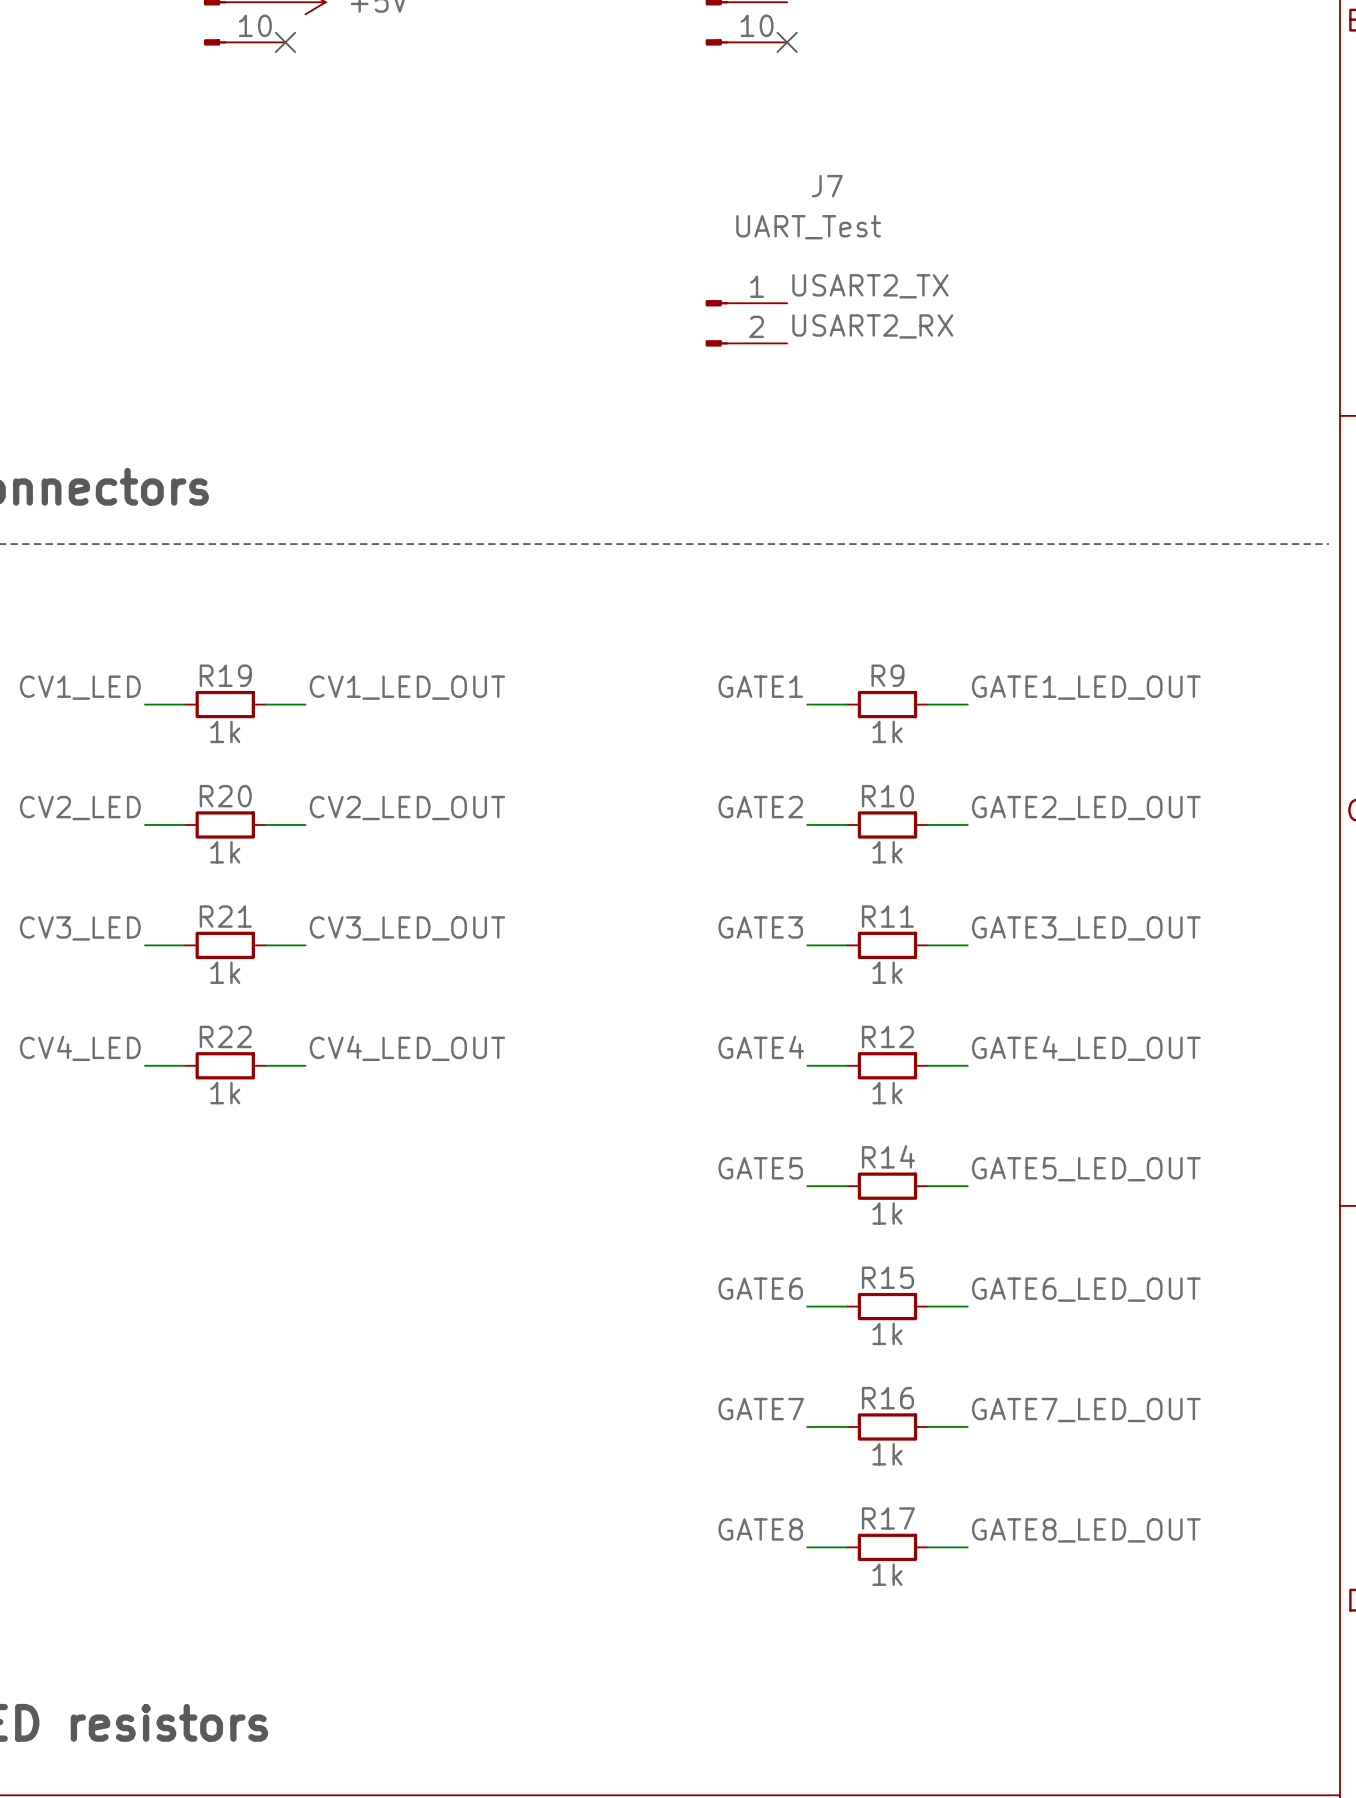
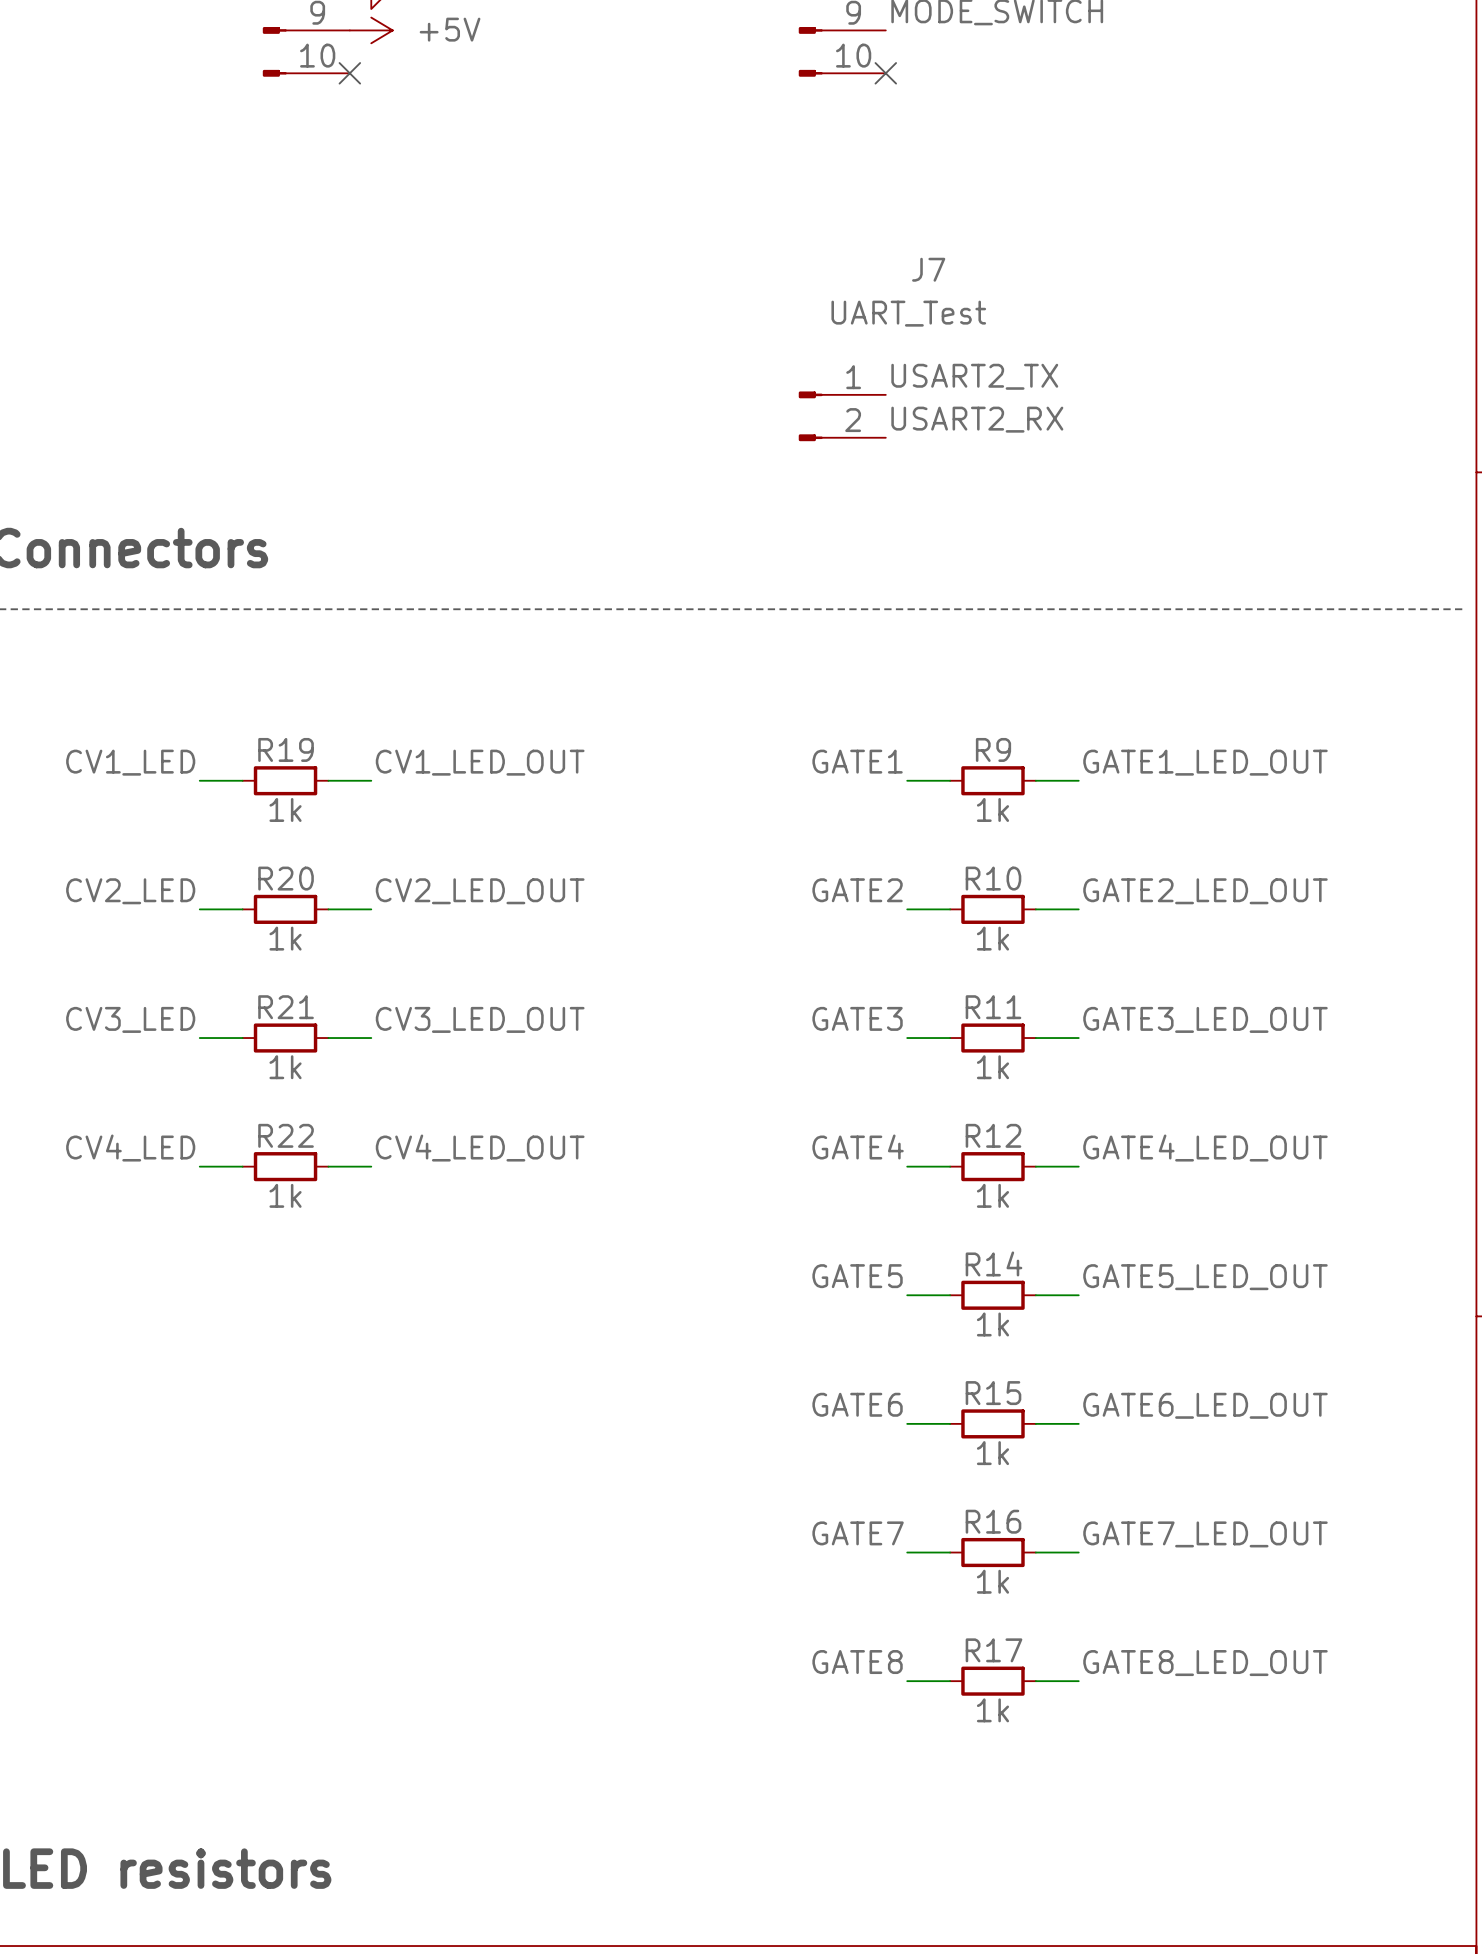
label: USART2_TX (870, 286) -> none
J7 position: (746, 323) -> (842, 416)
label: USART2_RX (872, 326) -> USART2_TX (974, 376)
label: none -> USART2_RX (977, 419)

